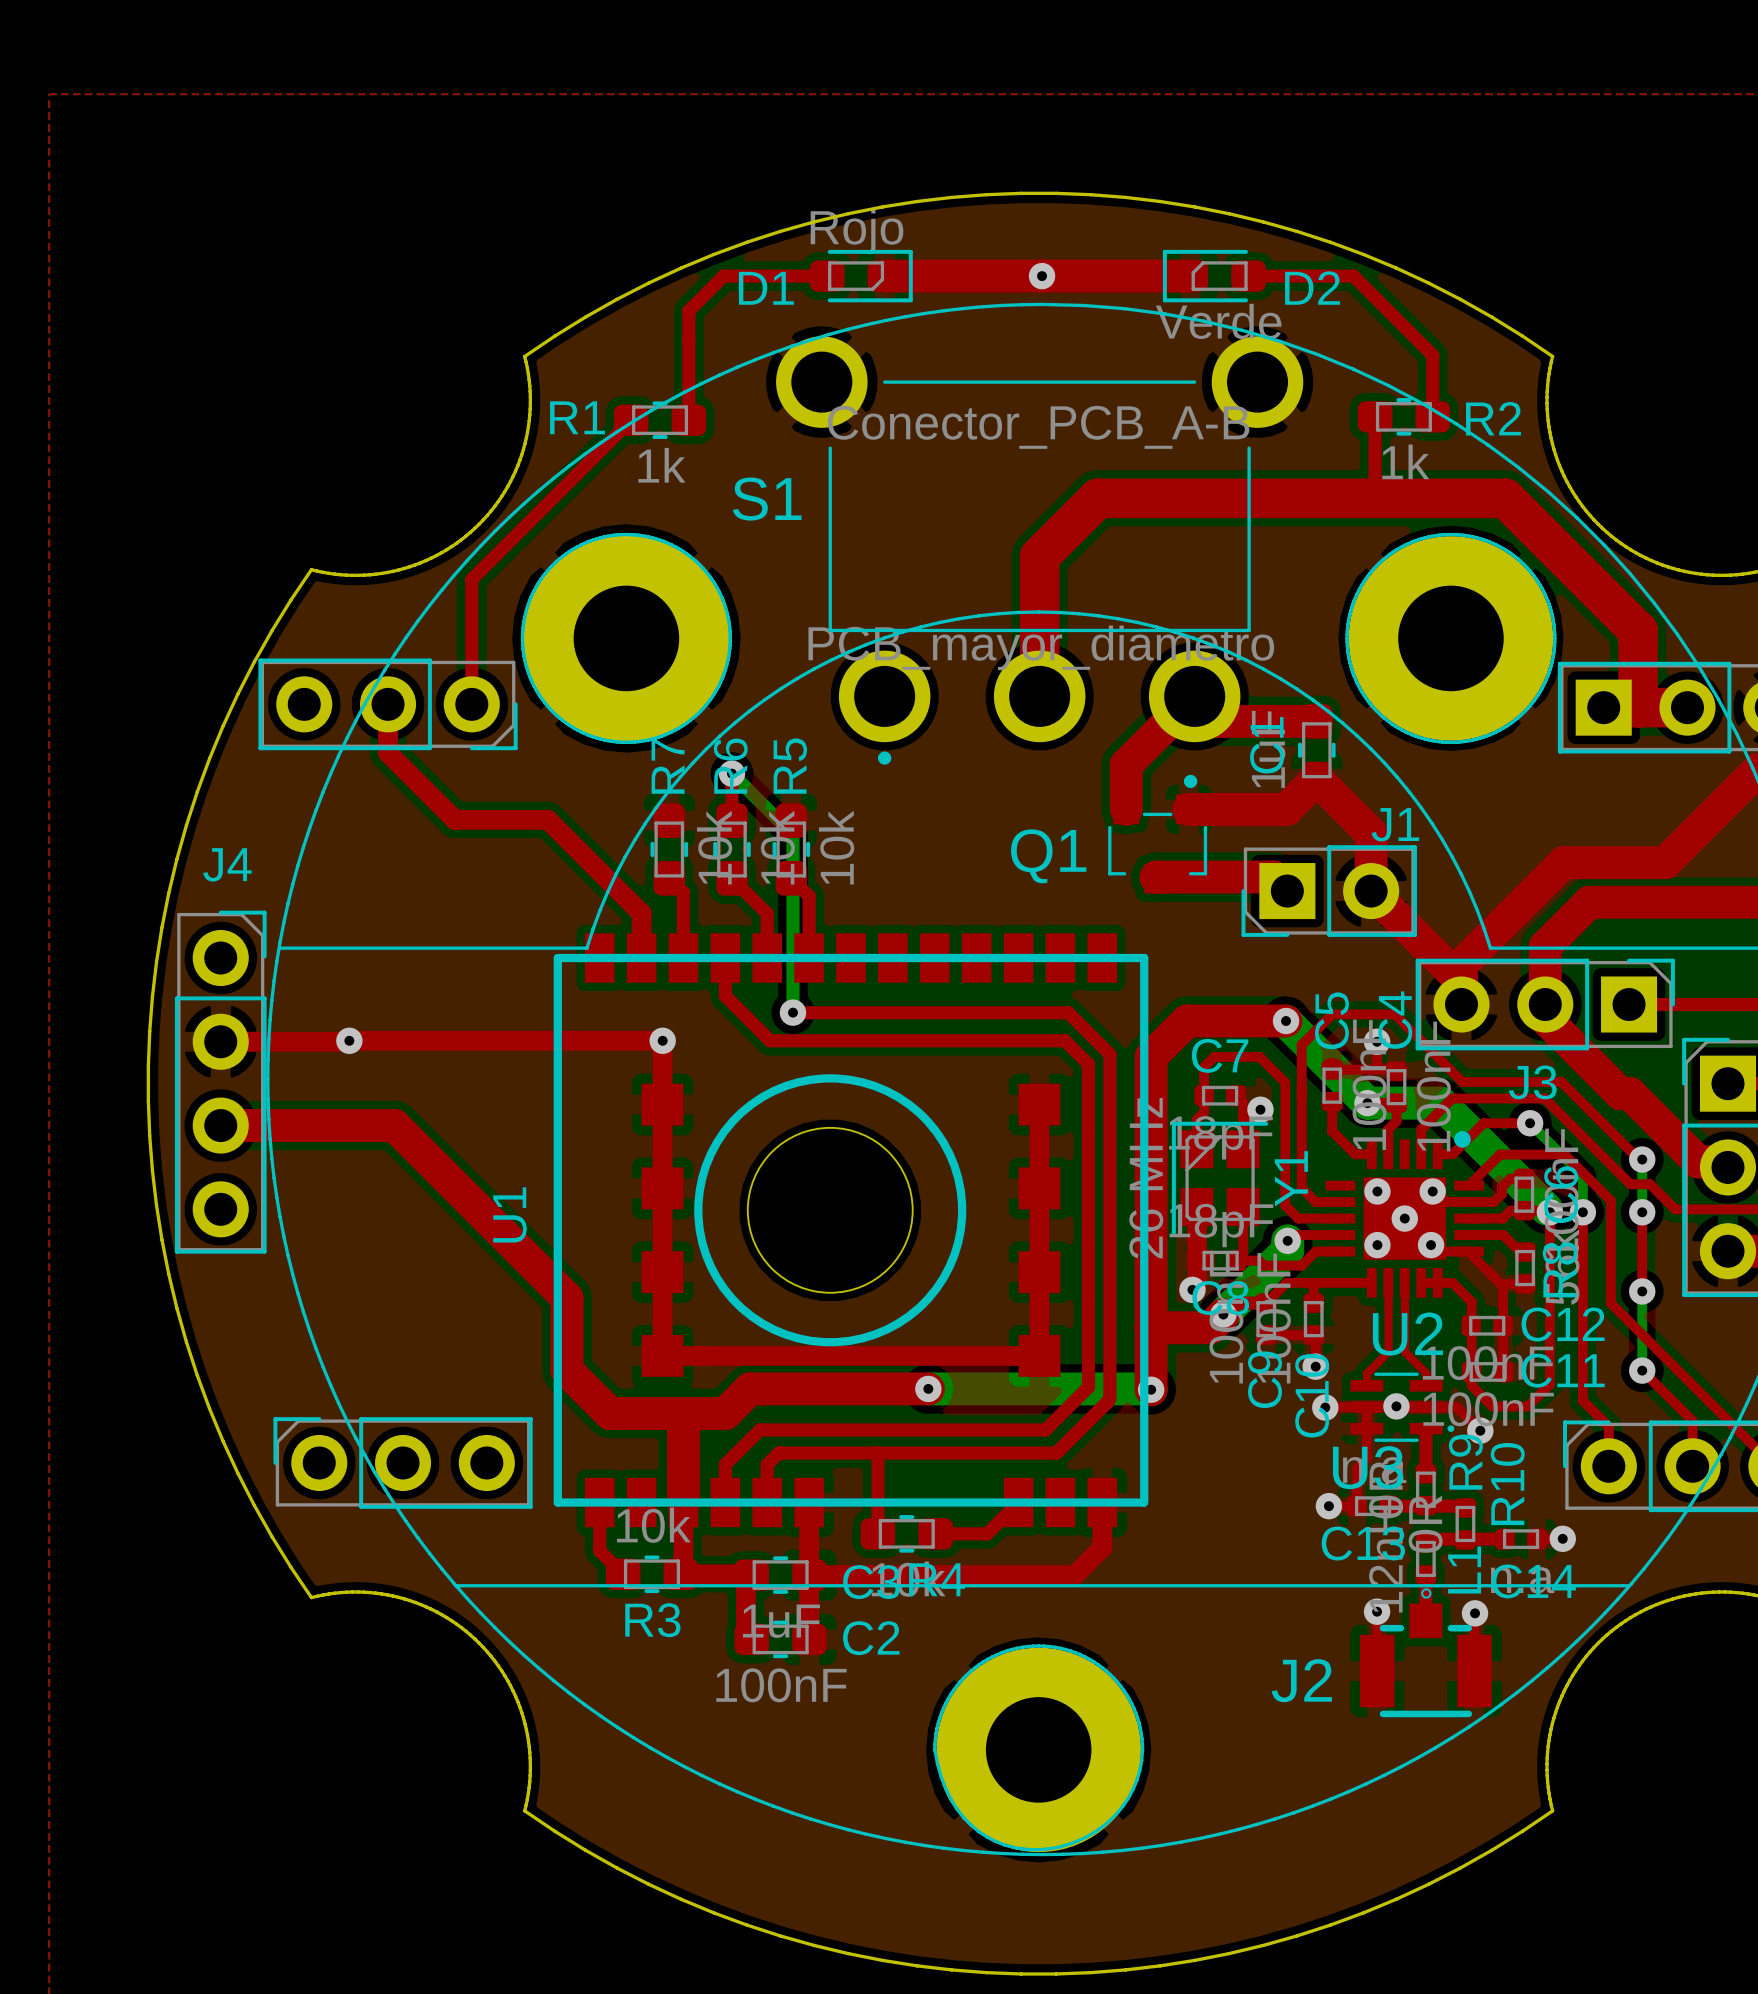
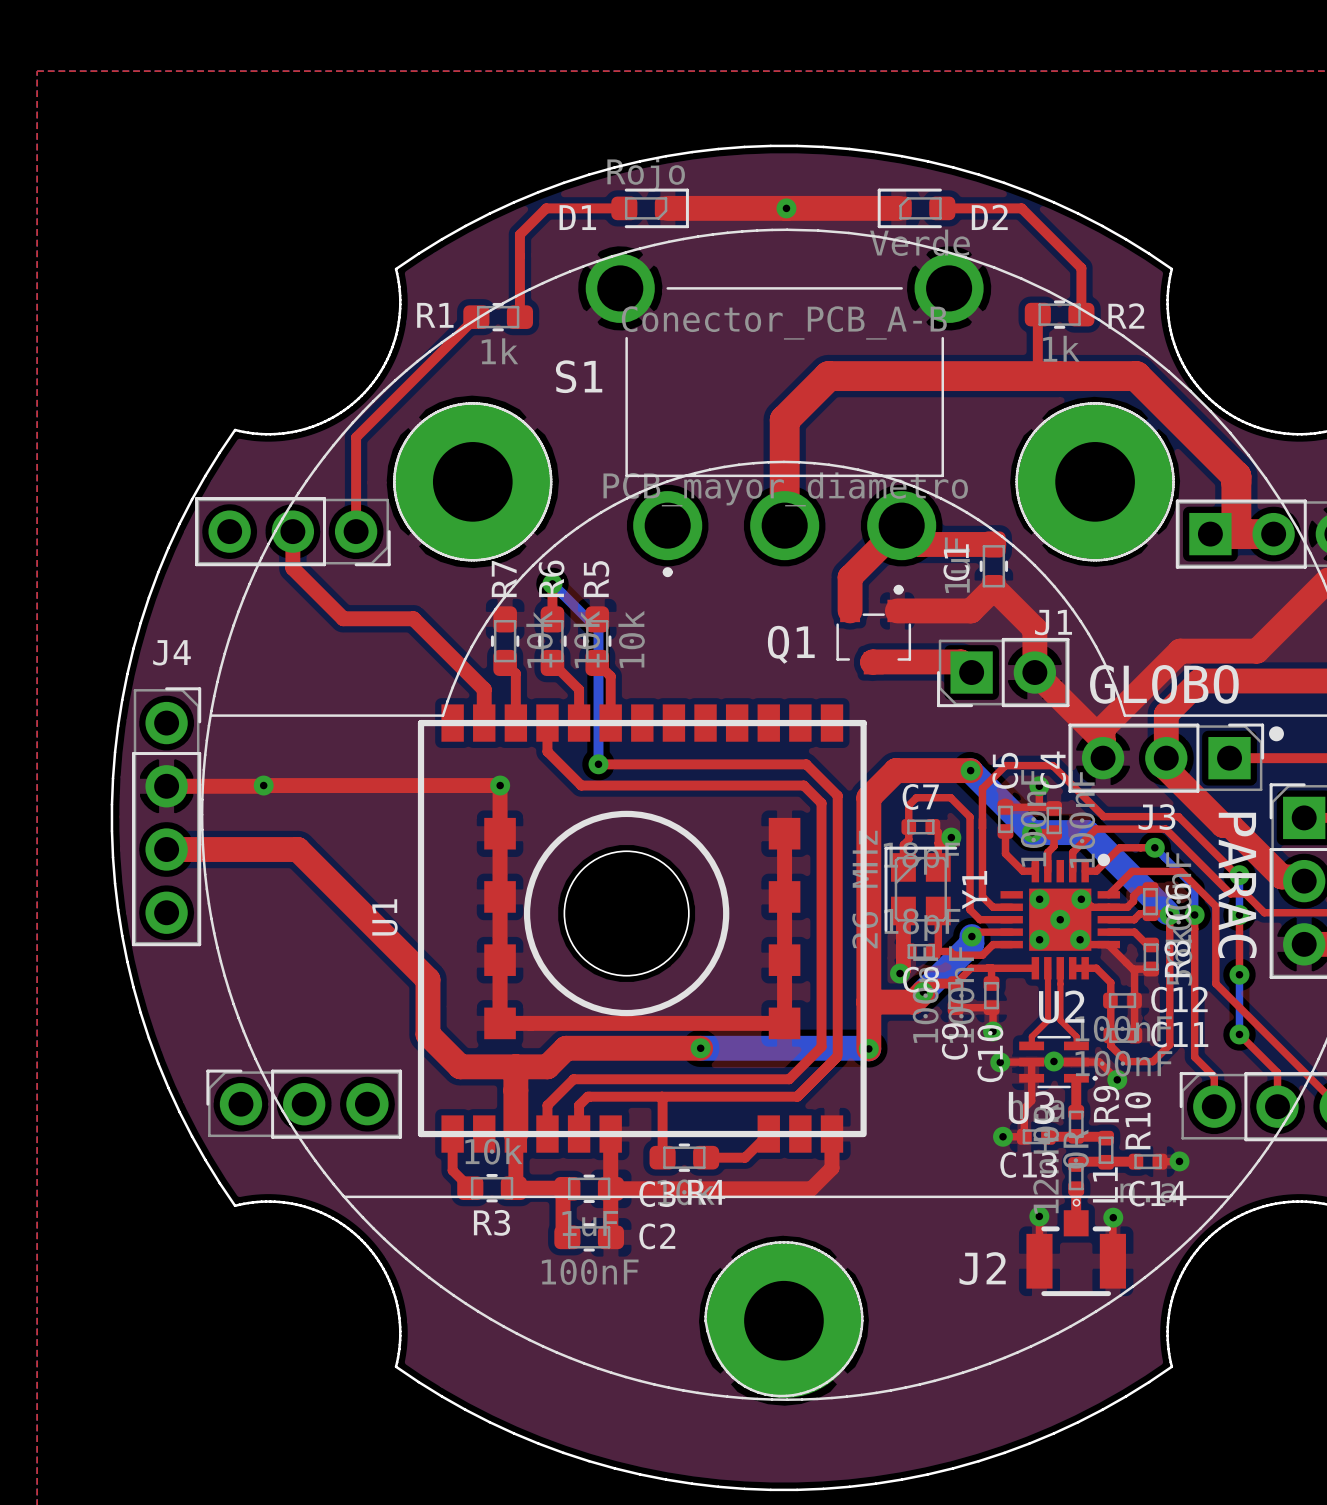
text: none -> GLOBO (1164, 684)
drawing: none -> [1269, 726, 1284, 742]
text: none -> PARAC (1237, 885)

